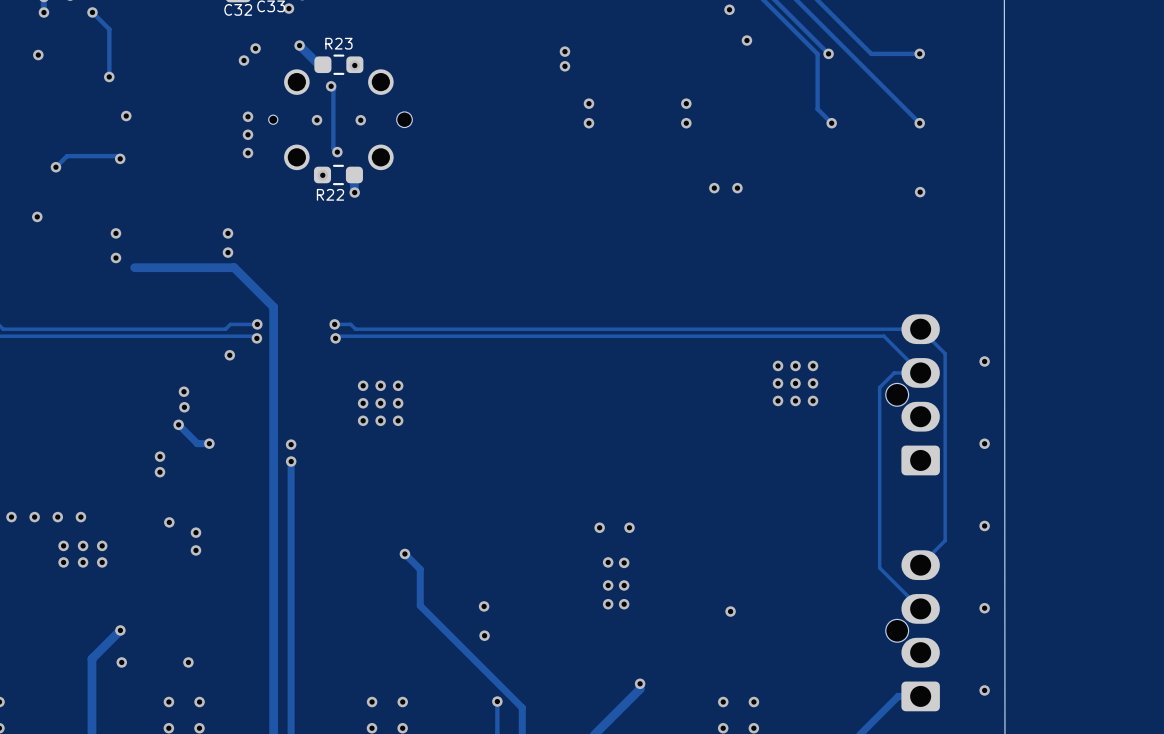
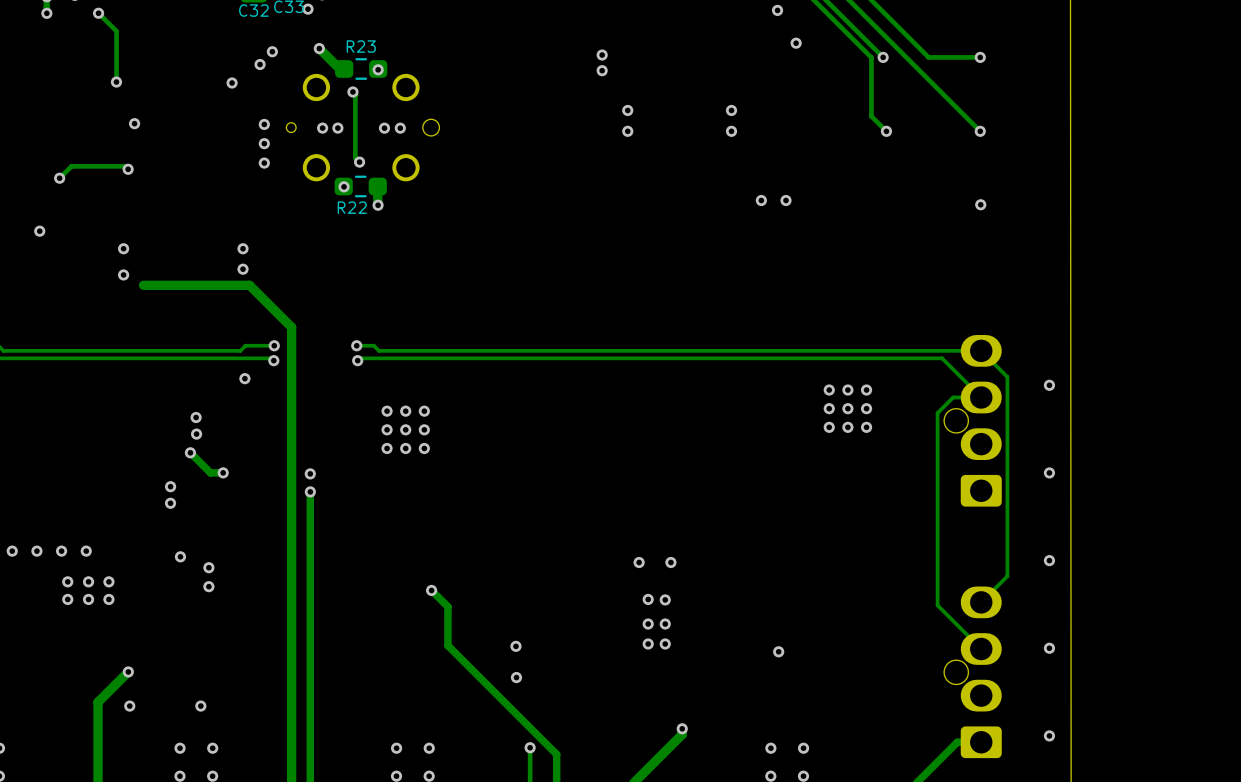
via: (38, 55) -> none
via: none -> (232, 82)
via: none -> (322, 128)
via: none -> (400, 128)

